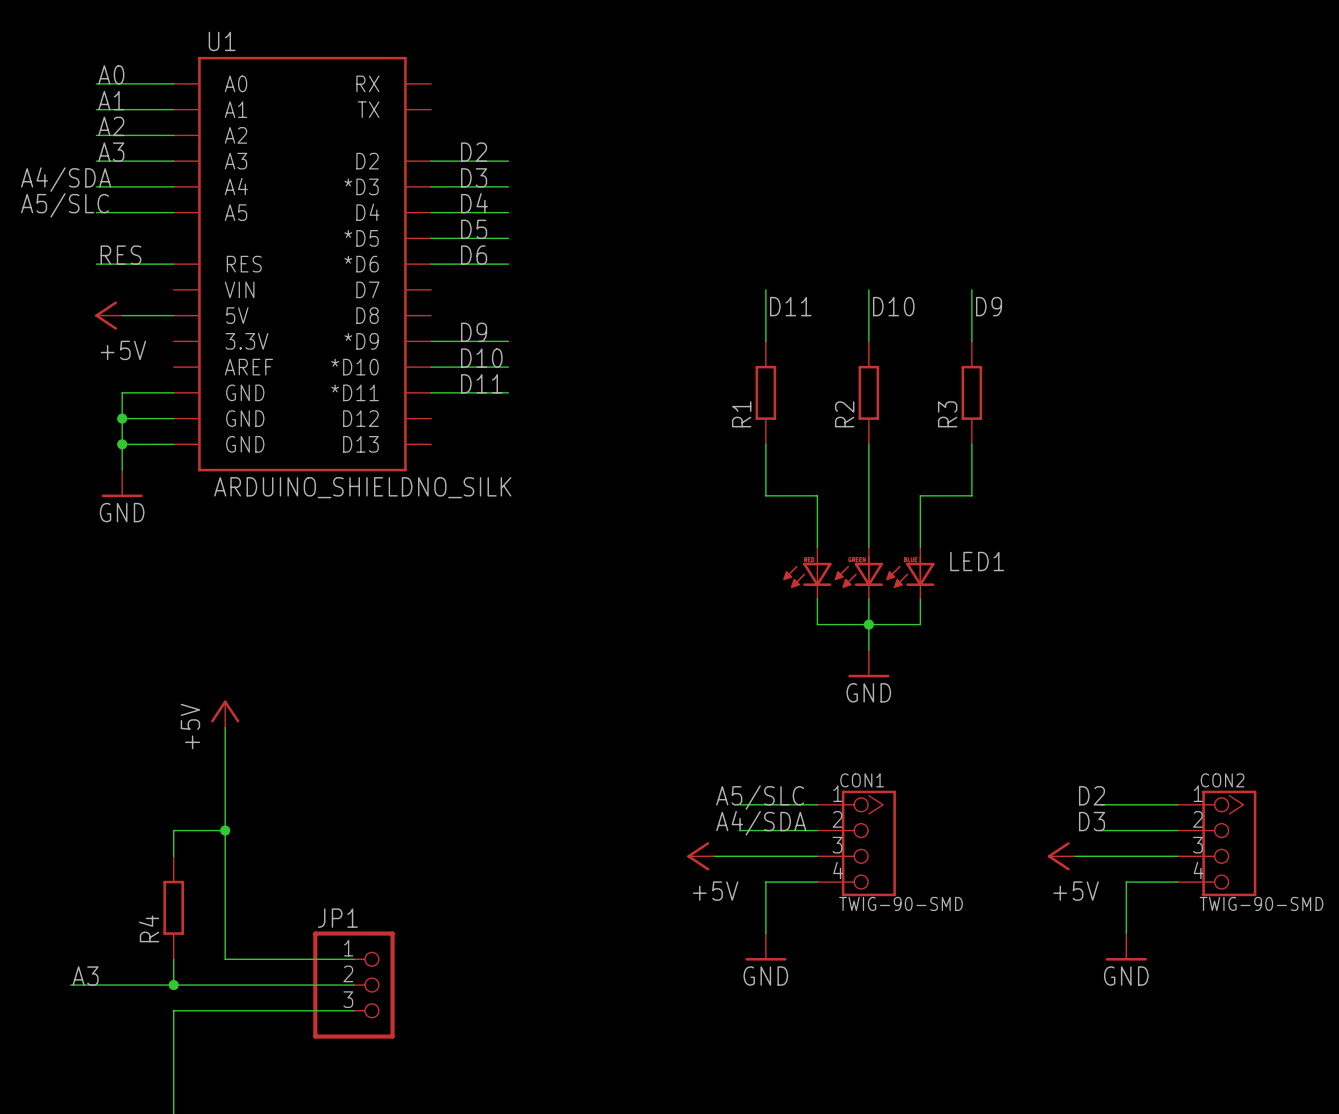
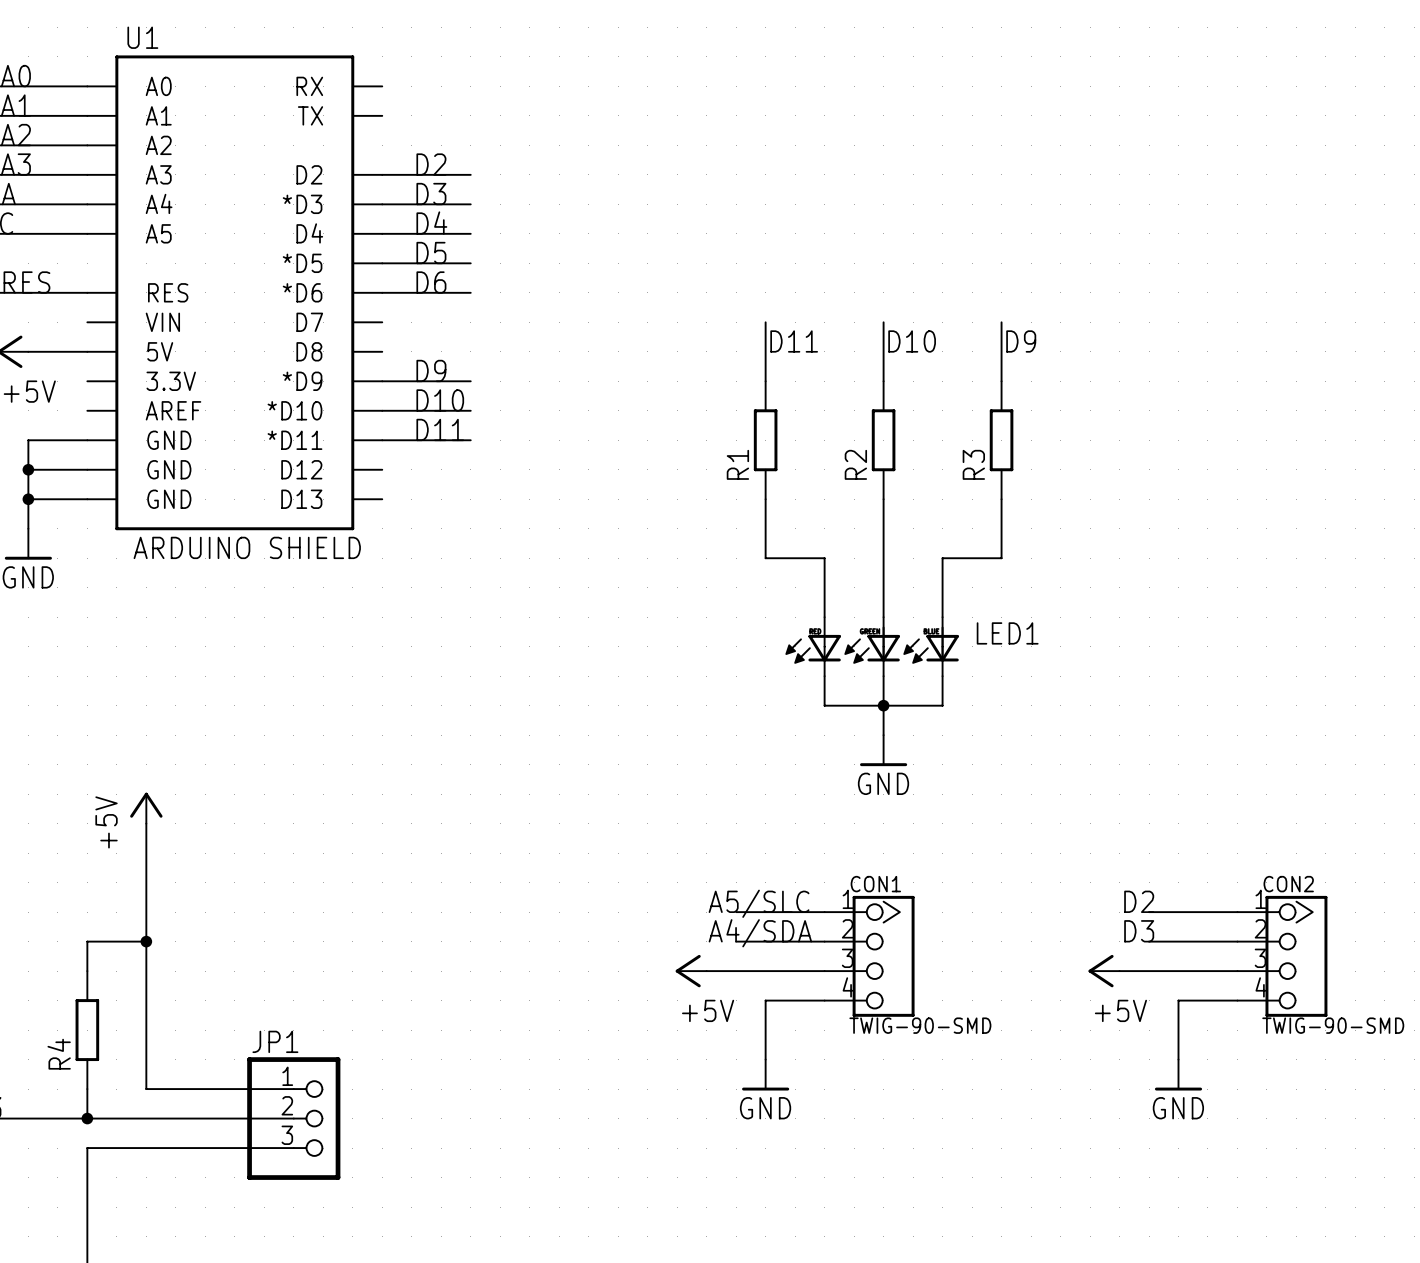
U1 value: ARDUINO_SHIELDNO_SILK (362, 487) -> ARDUINO SHIELD (247, 547)

